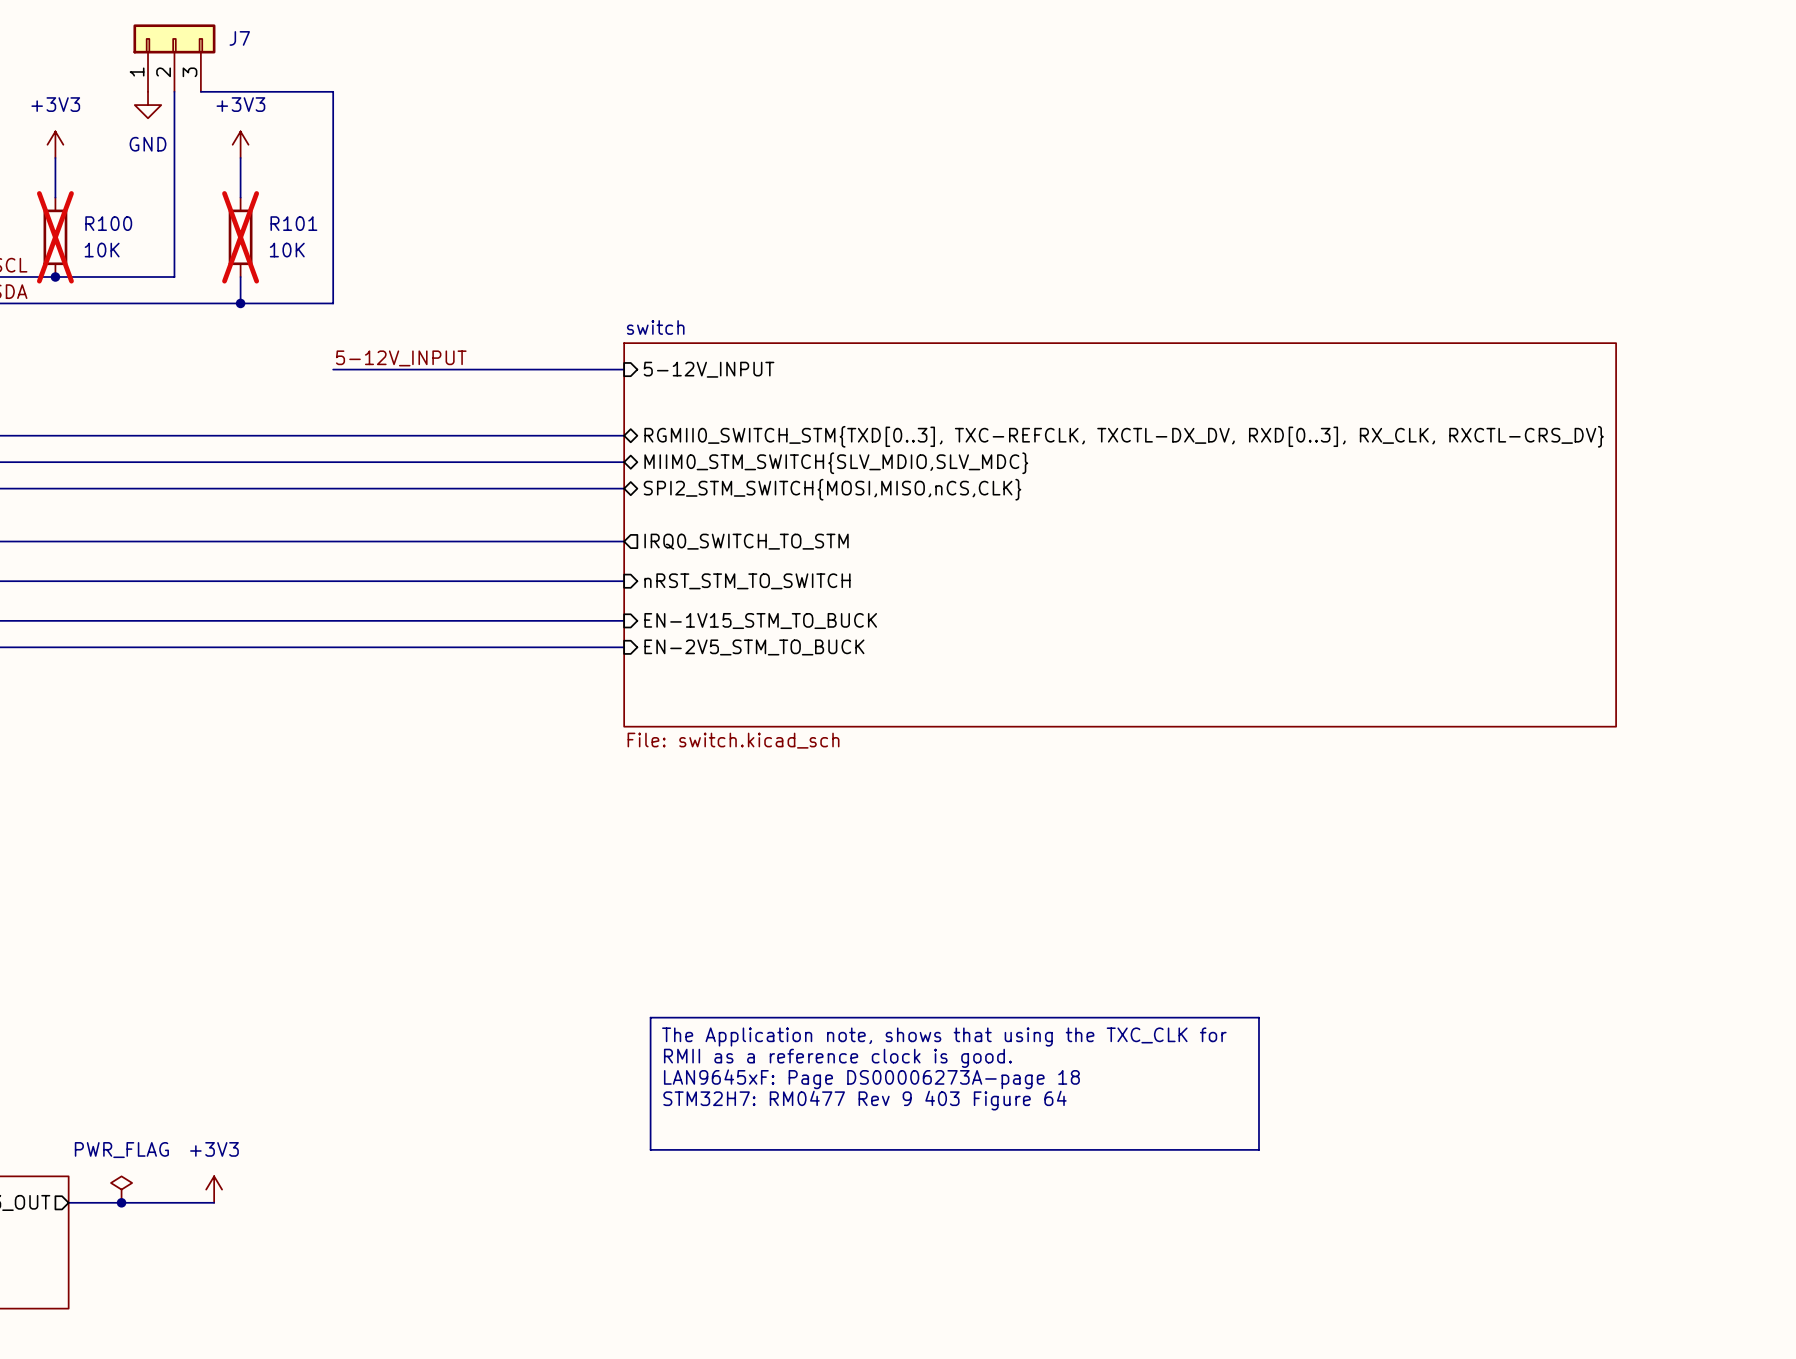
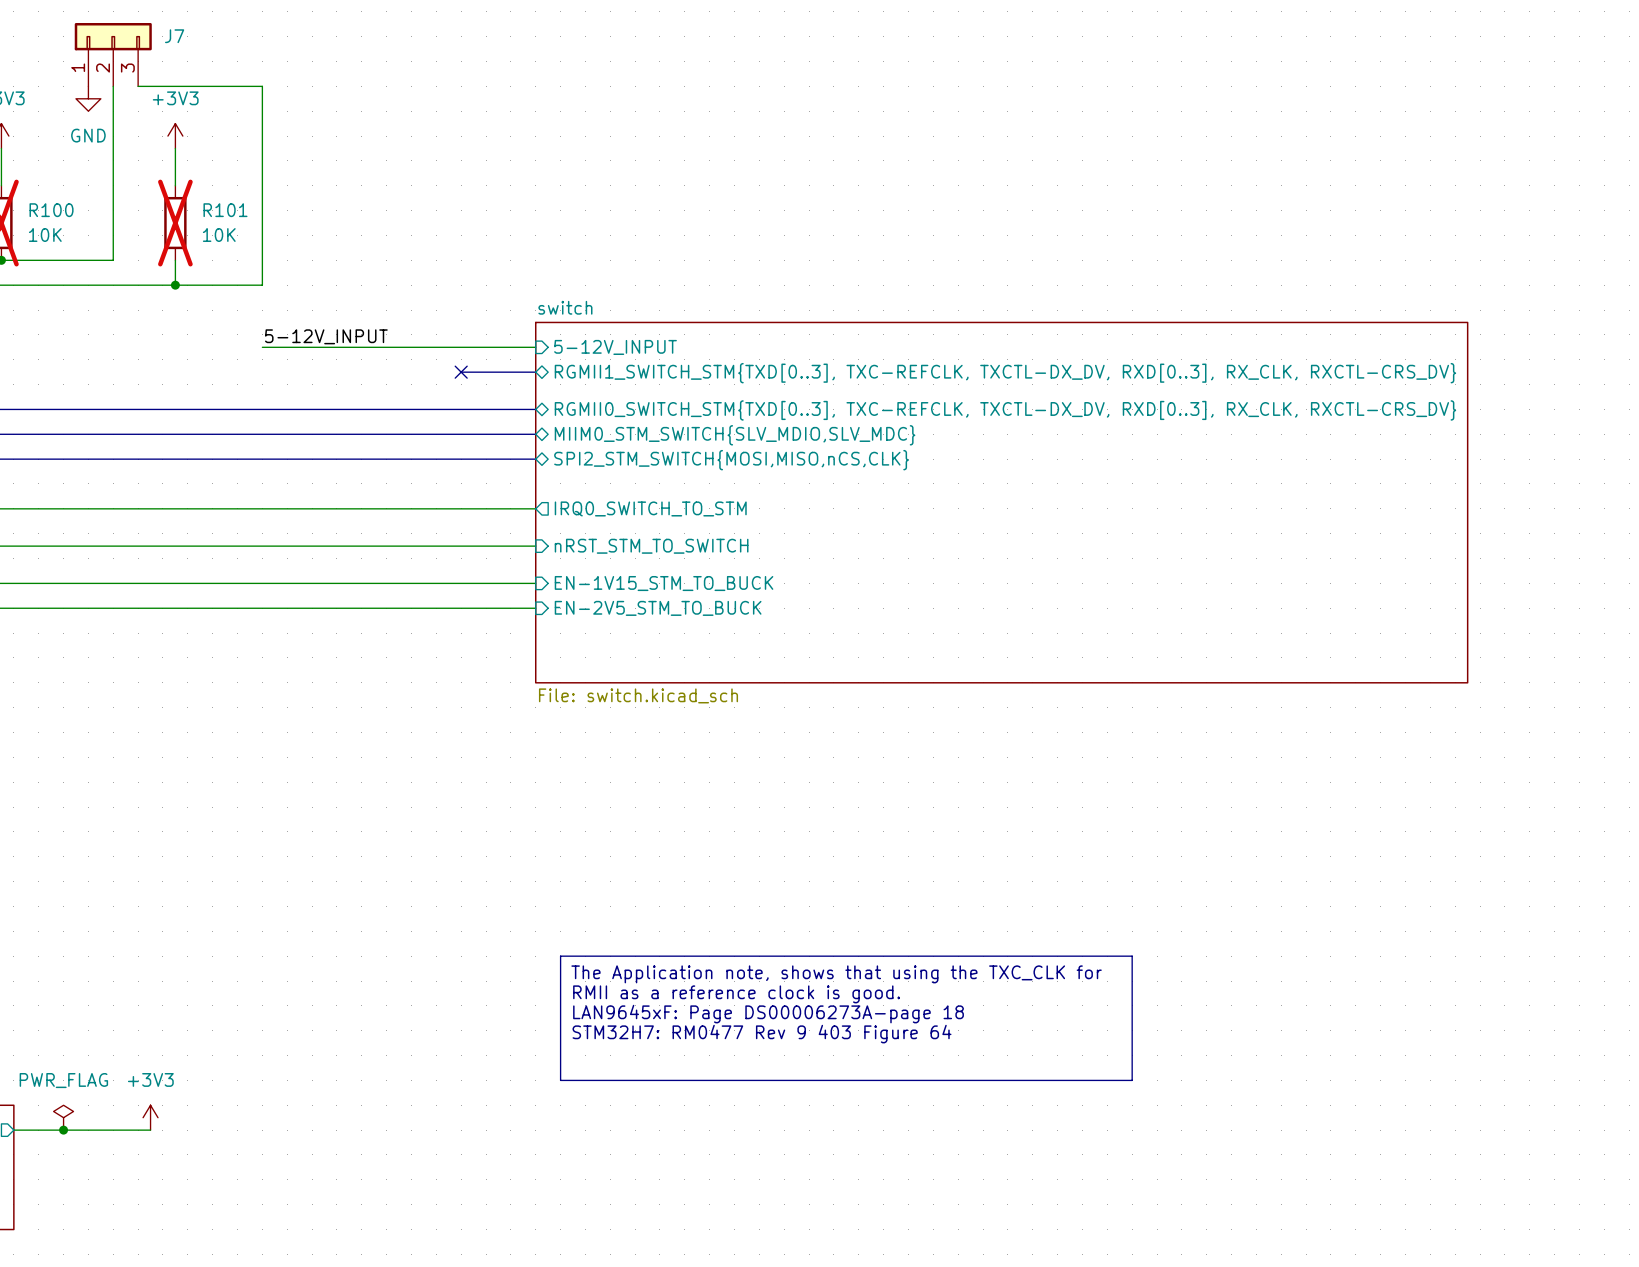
bus: none -> (461, 372) (535, 372)
no-connect mark: none -> (461, 372)
sheet pin: none -> RGMII1_SWITCH_STM{TXD[0..3], TXC-REFCLK, TXCTL-DX_DV, RXD[0..3], RX_CLK, RXCTL-CRS_DV} (1005, 373)

